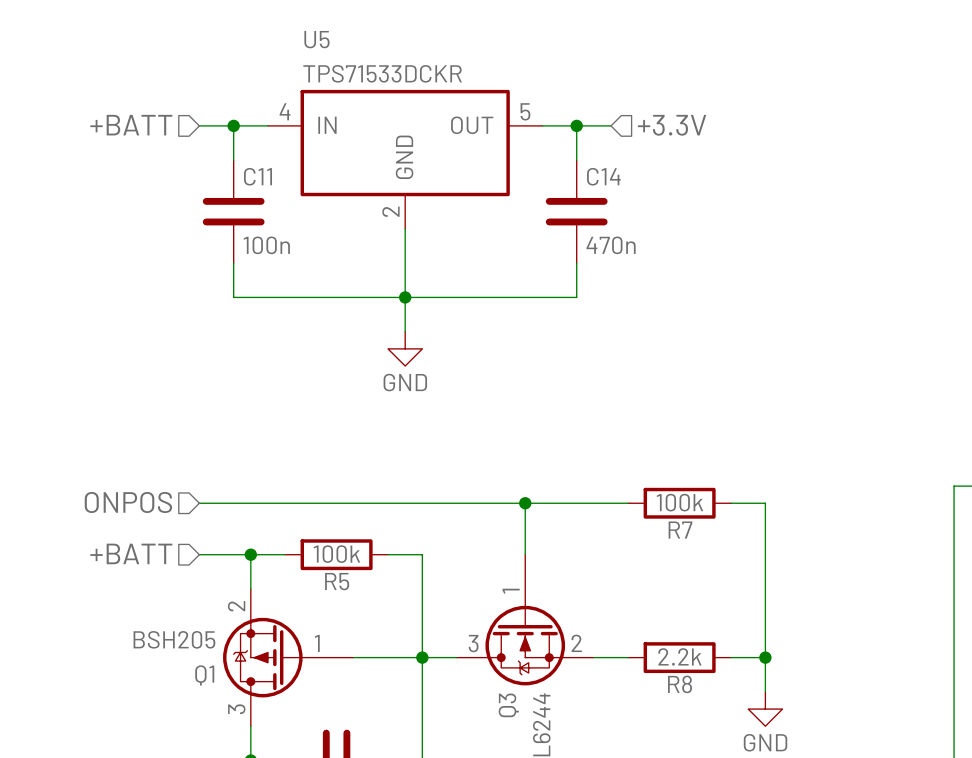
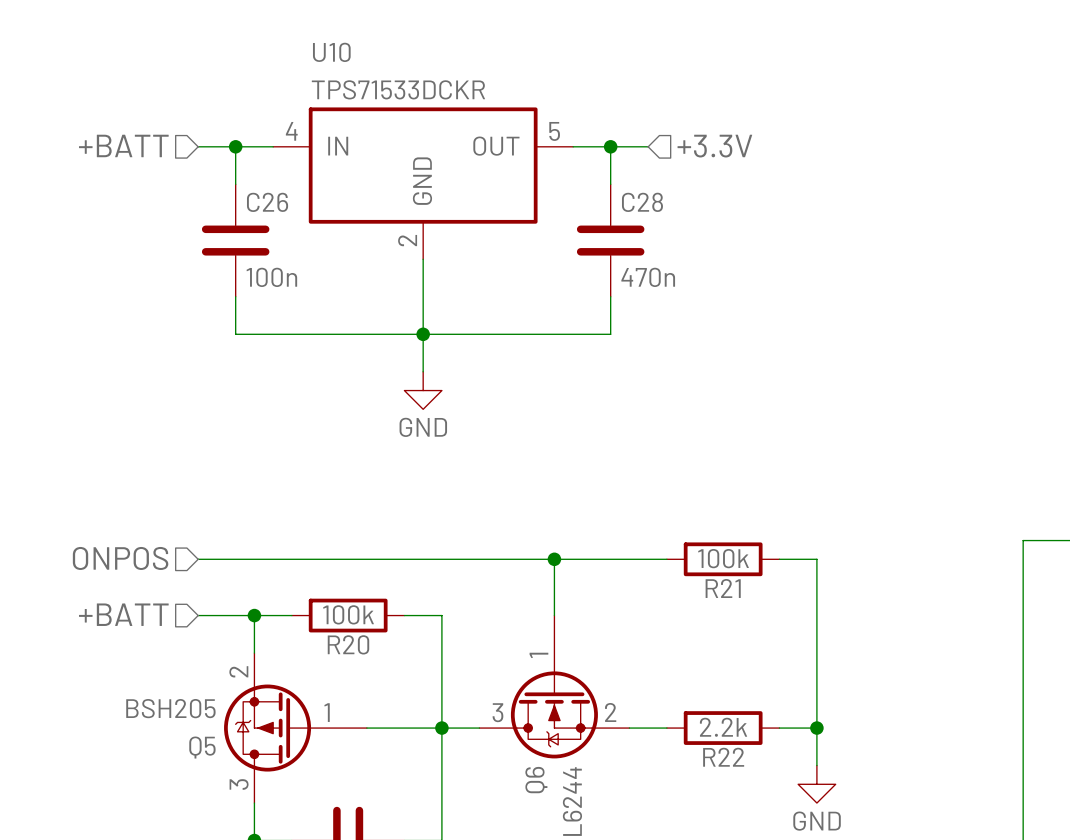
U5 name: U5 (316, 39) -> U10 (331, 52)
C11 name: C11 (258, 176) -> C26 (267, 202)
C14 name: C14 (603, 176) -> C28 (642, 202)
R7 name: R7 (680, 530) -> R21 (723, 588)
R5 name: R5 (337, 581) -> R20 (348, 644)
Q1 name: Q1 (204, 675) -> Q5 (202, 747)
R8 name: R8 (680, 684) -> R22 (723, 757)
Q3 name: Q3 (508, 705) -> Q6 (536, 780)

